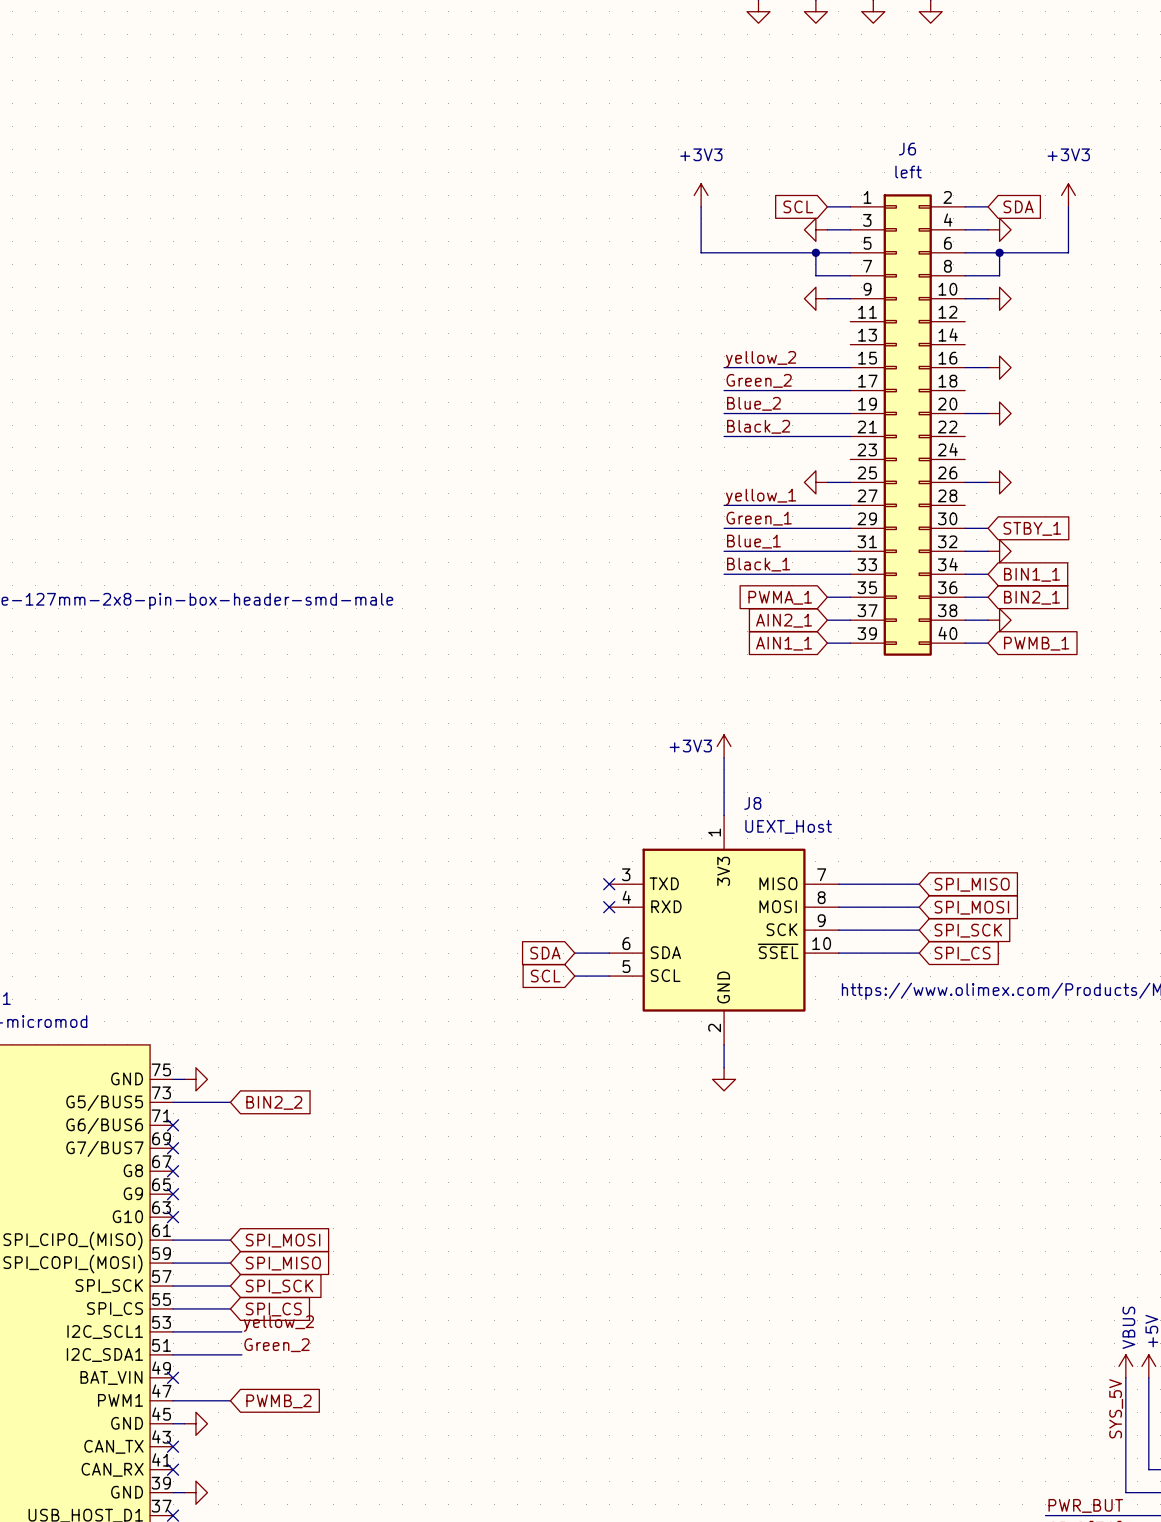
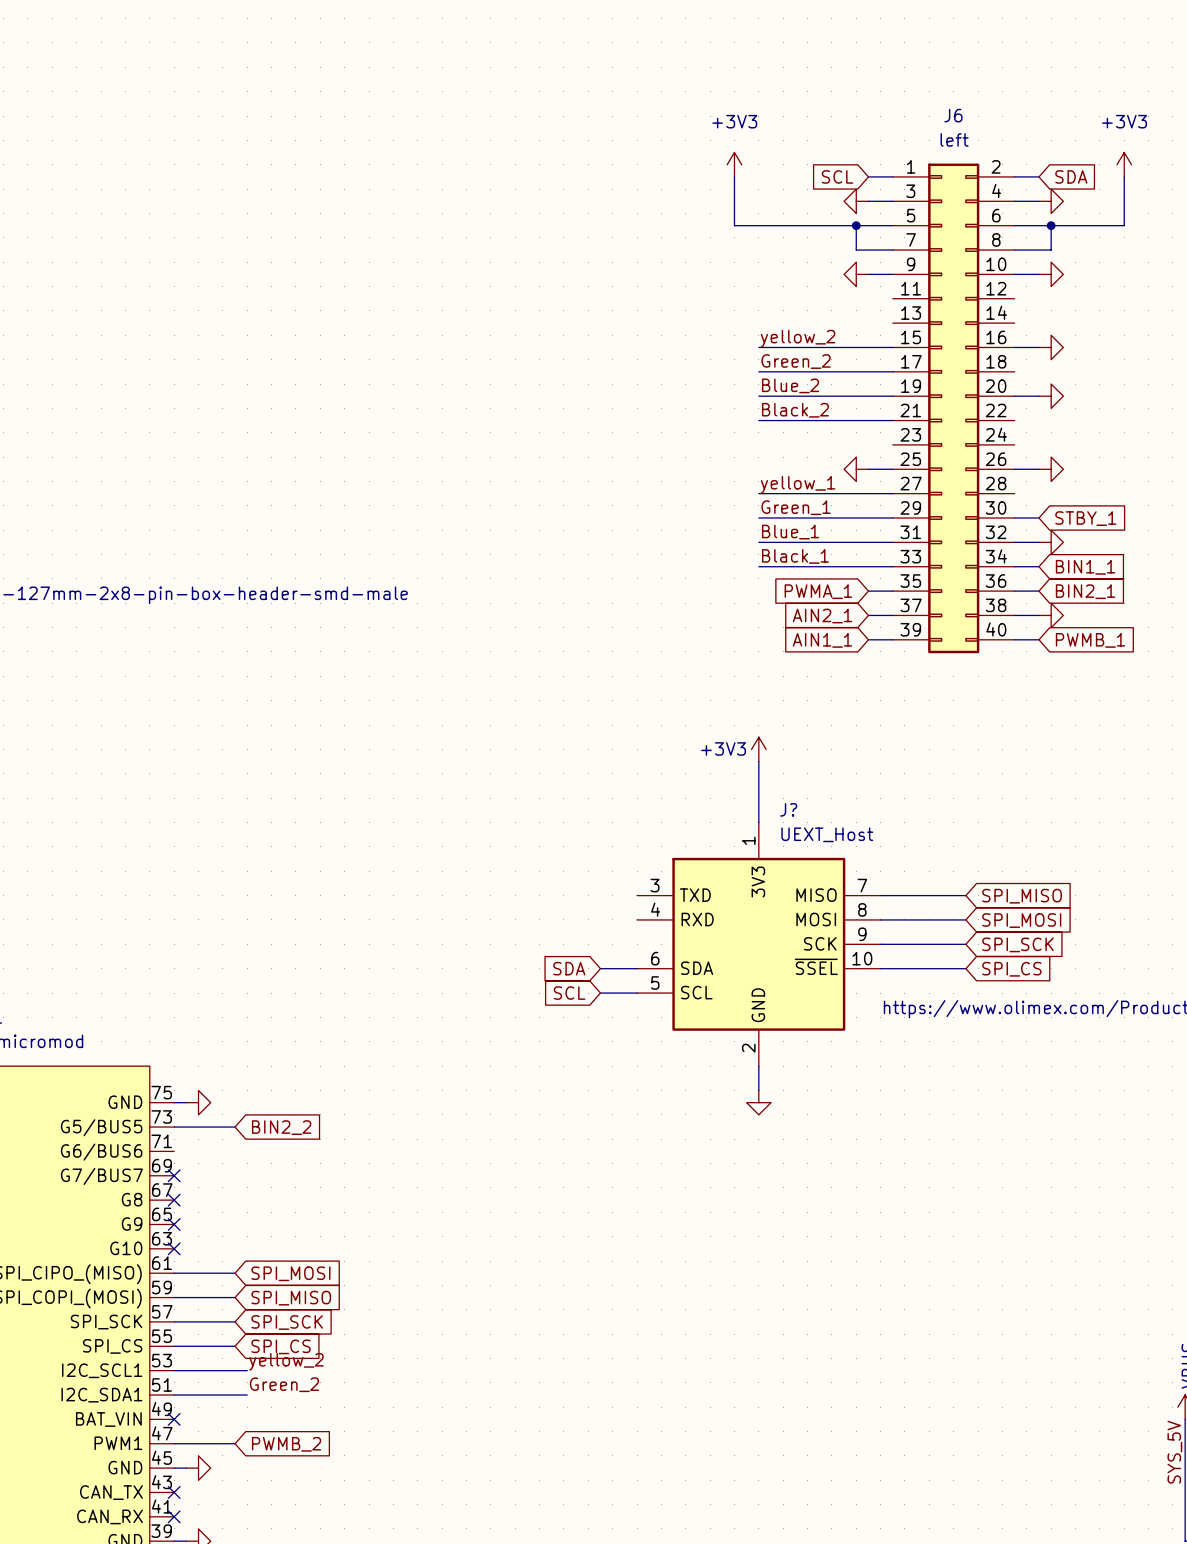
J8 name: J8 (752, 803) -> J? (788, 809)
no-connect mark: (609, 884) -> none
no-connect mark: (609, 907) -> none
no-connect mark: (173, 1125) -> none

